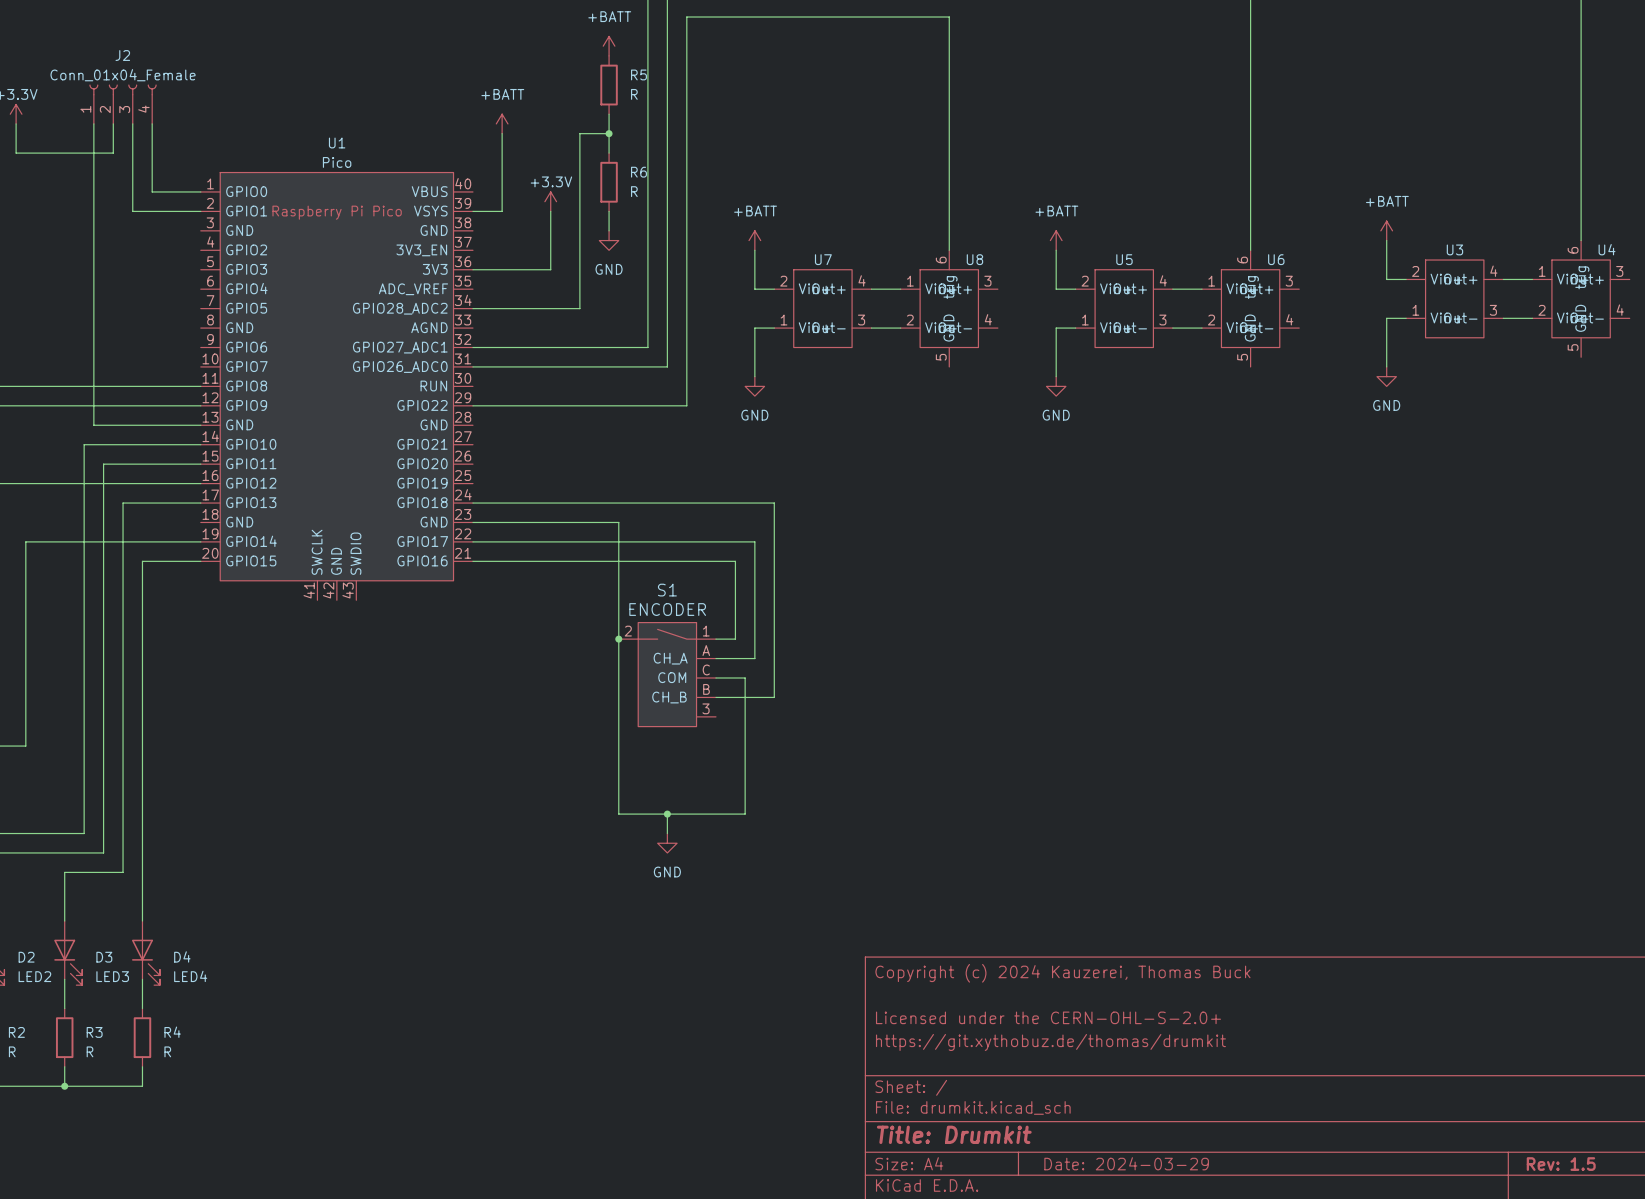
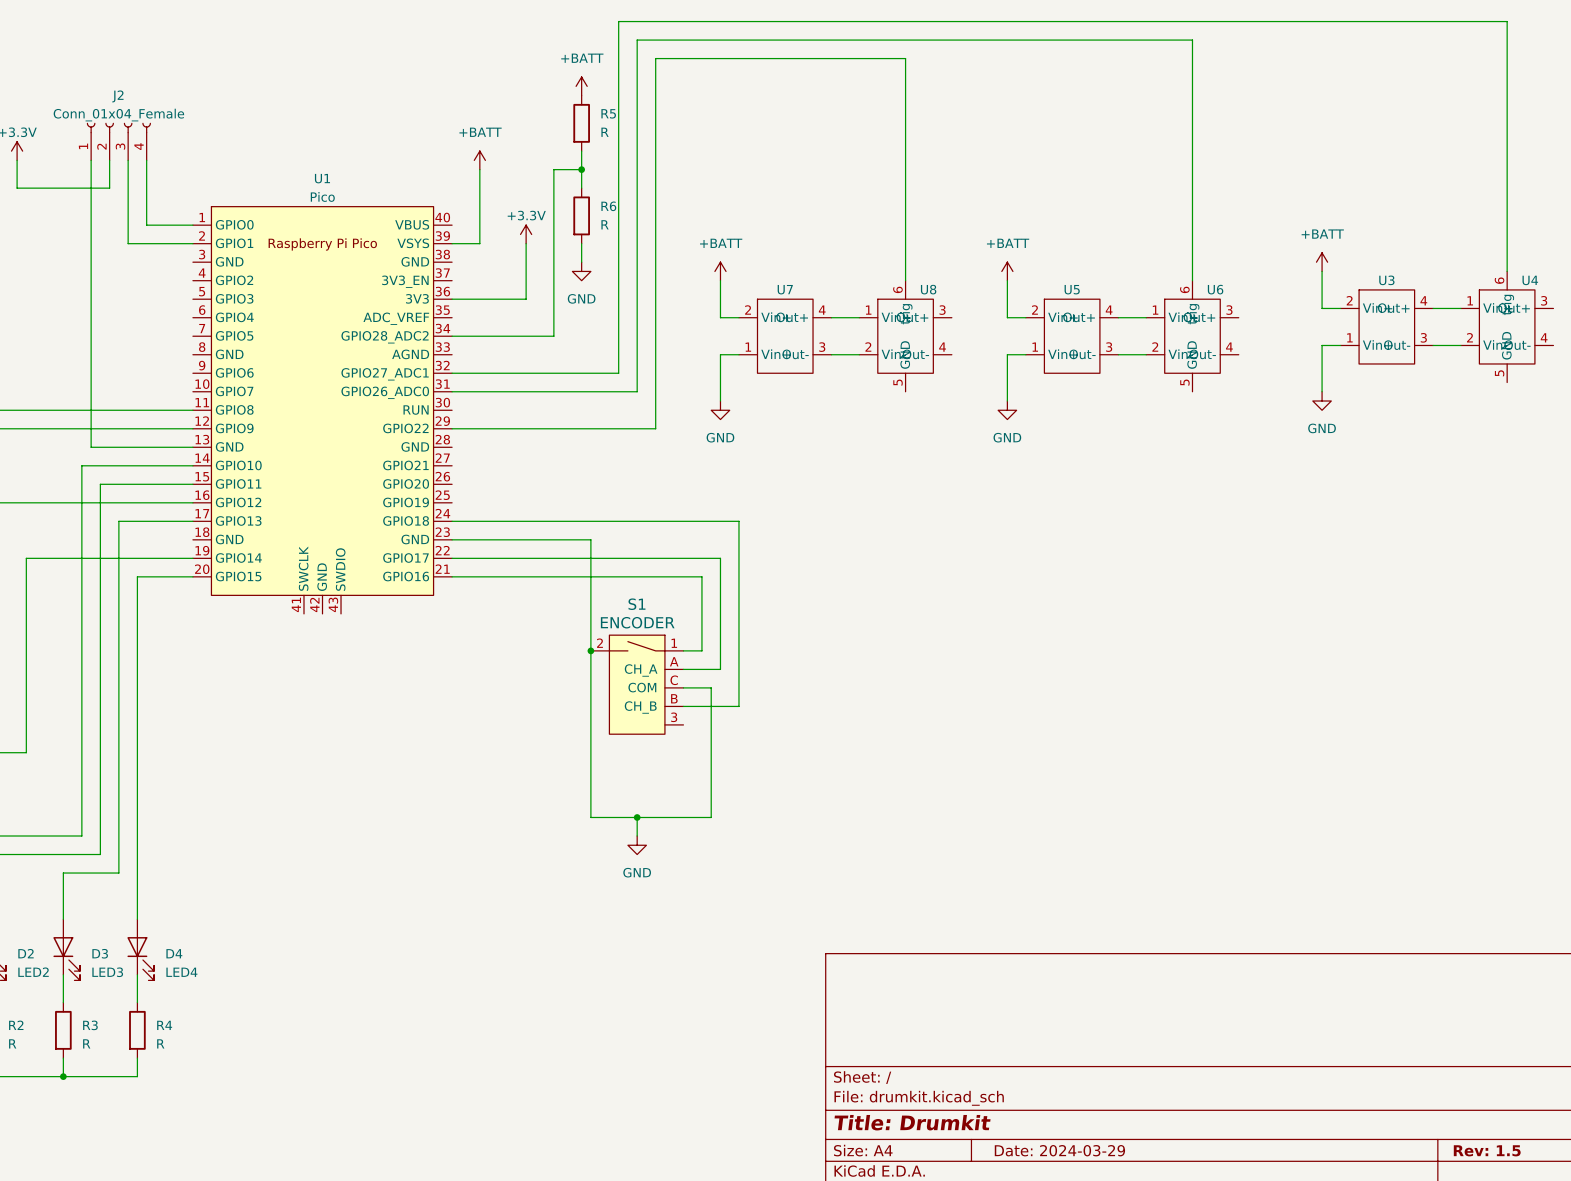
title block: Copyright (c) 2024 Kauzerei, Thomas Buck (1062, 973) -> none
title block: Licensed under the CERN-OHL-S-2.0+ (1048, 1017) -> none
title block: https://git.xythobuz.de/thomas/drumkit (1050, 1042) -> none

